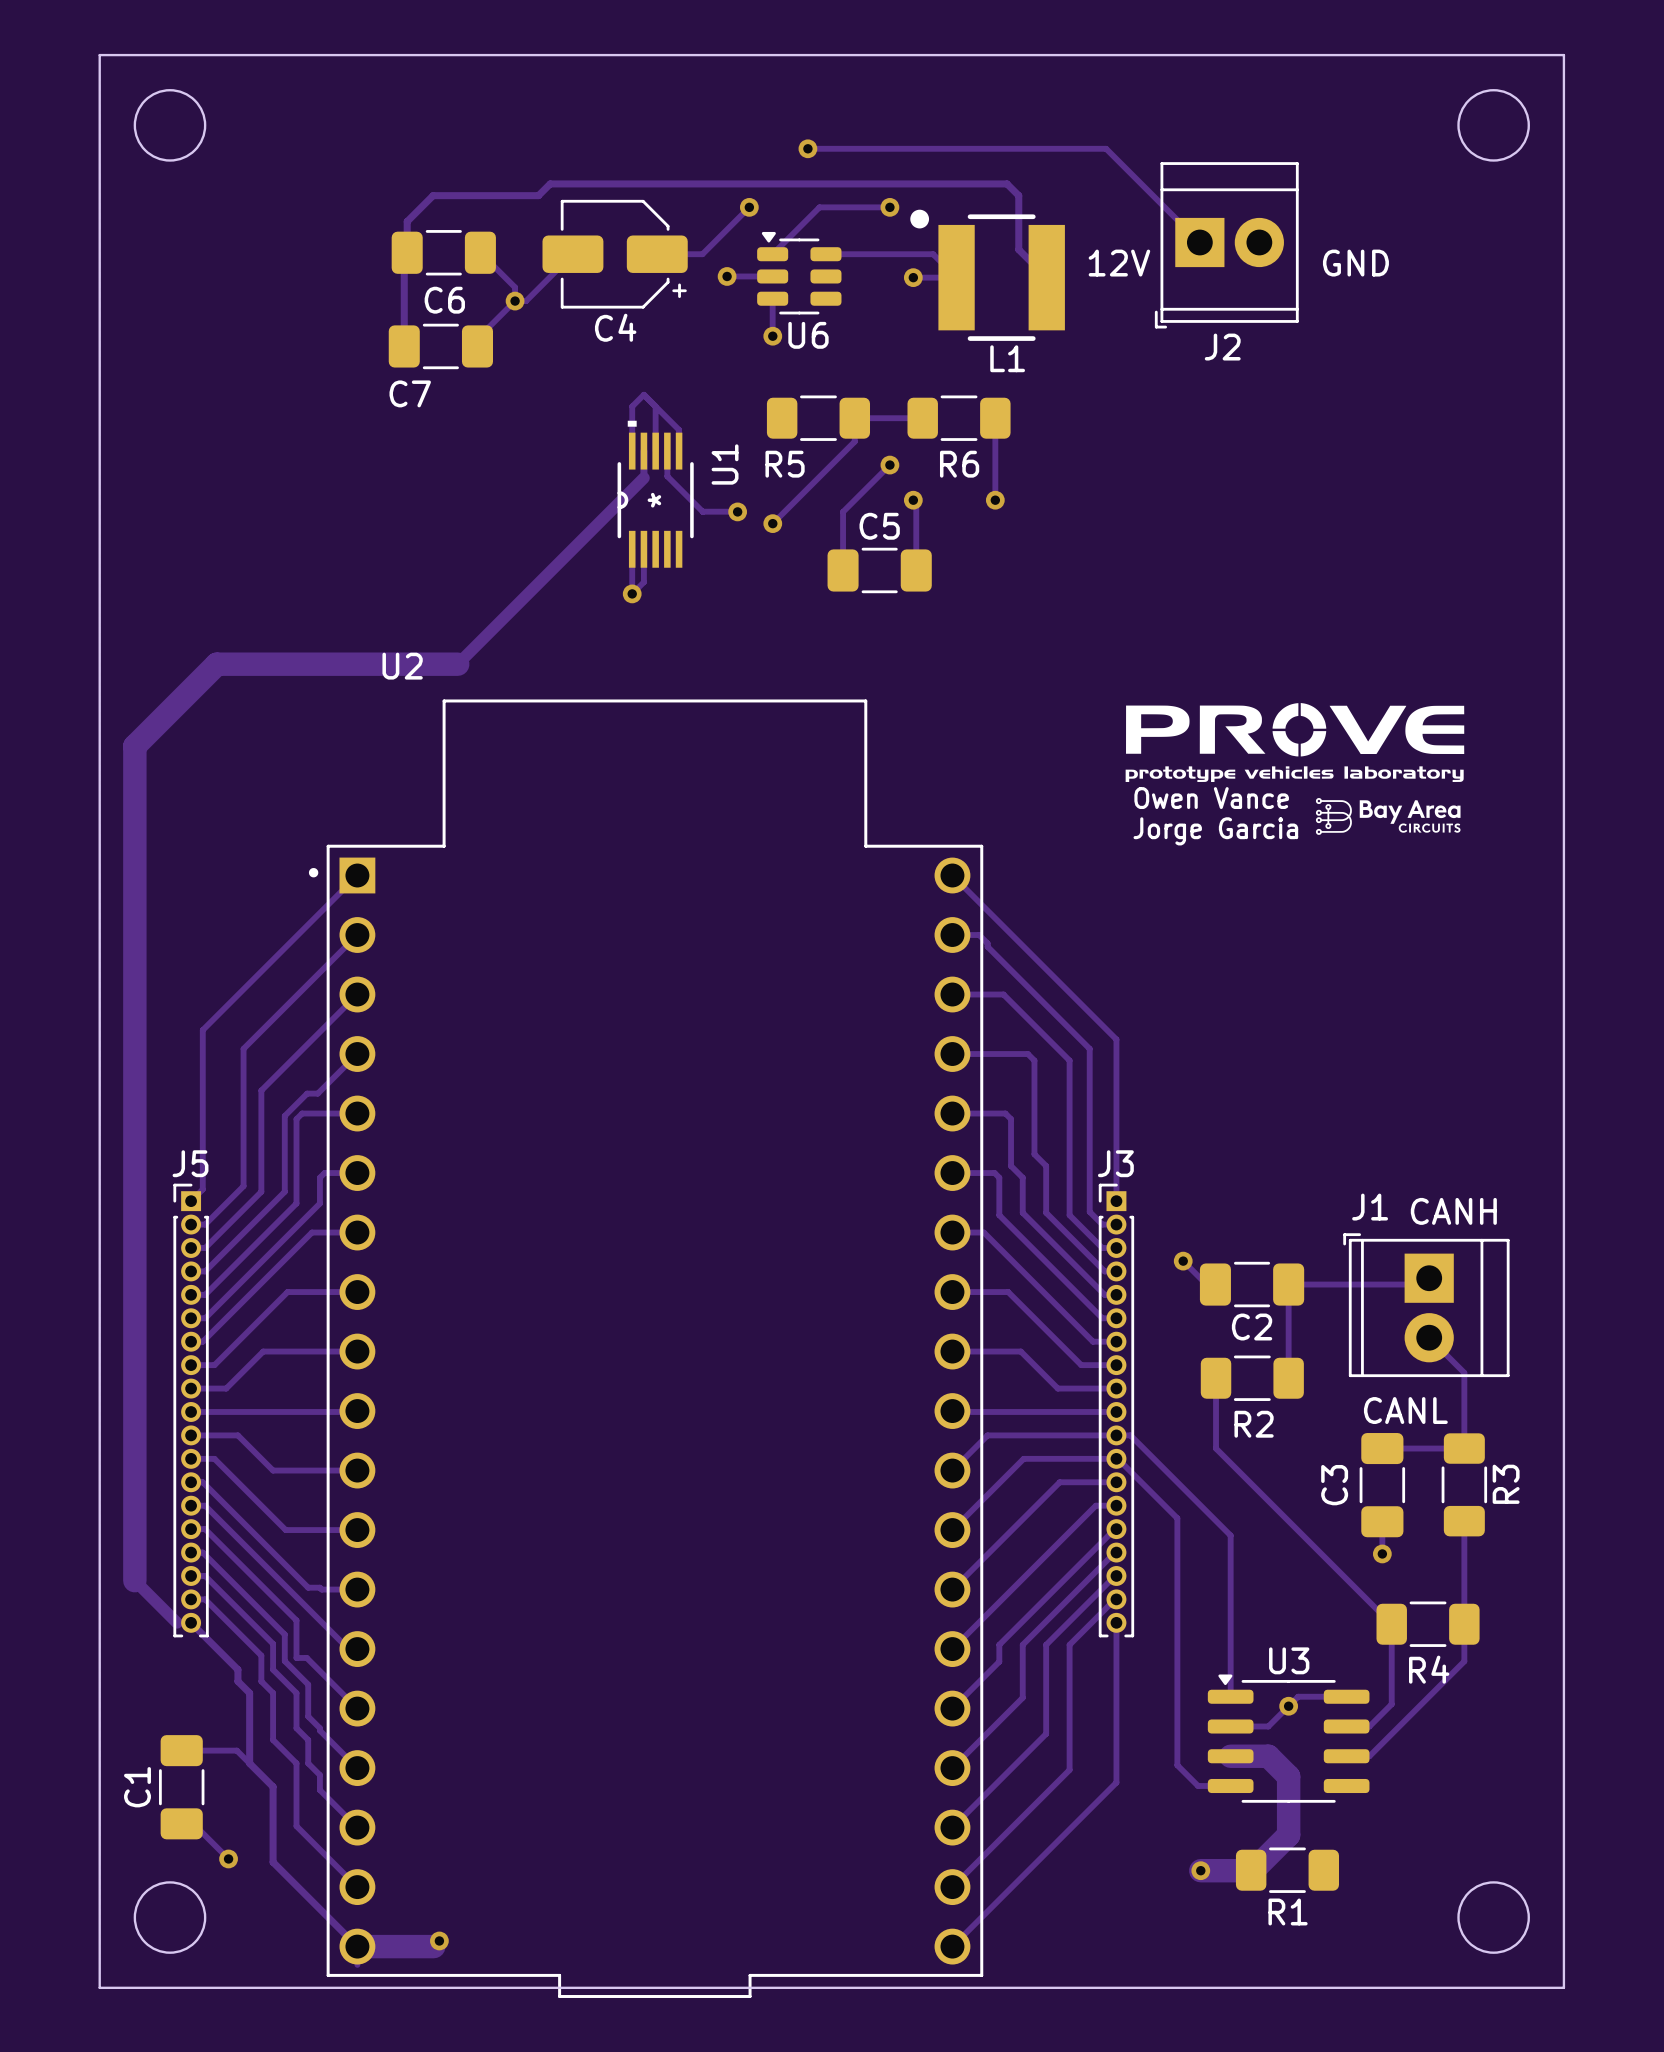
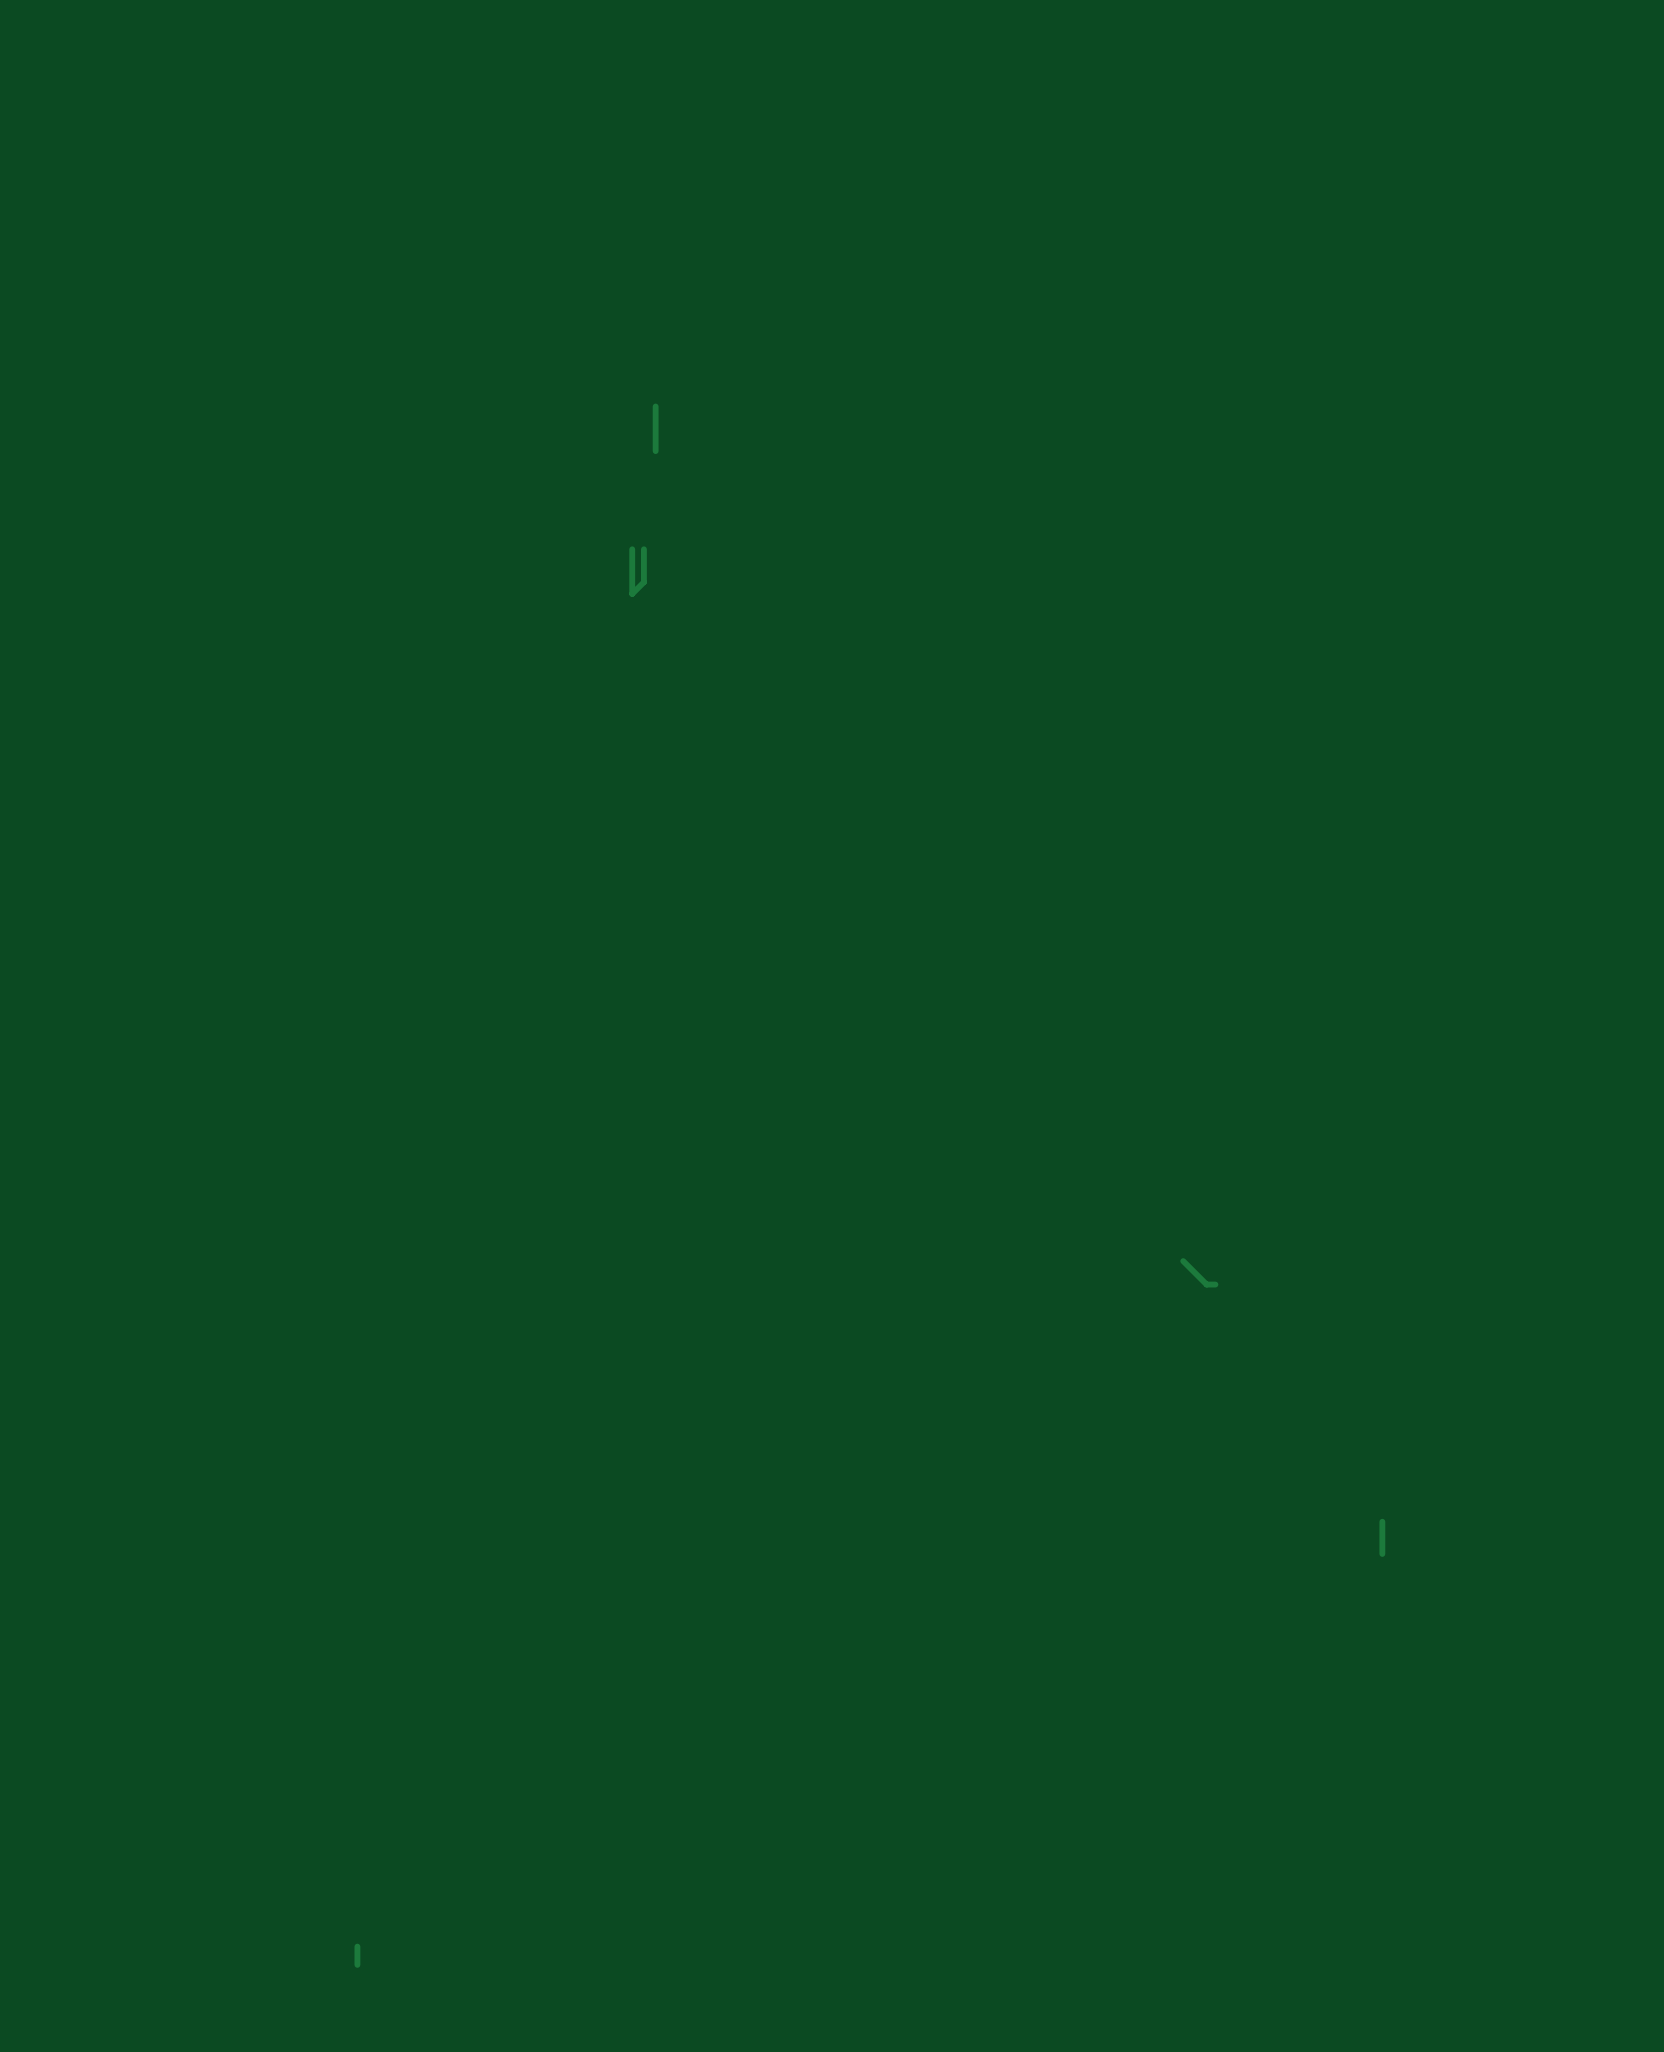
board edge: (99, 55) (1563, 55) (1563, 1987) (99, 1987) (99, 55) -> none
round board edge: [133, 89, 207, 162] -> none
round board edge: [1457, 89, 1530, 162] -> none
track: (807, 148) (1106, 148) (1199, 242) -> none
via: (807, 148) -> none
track: (749, 207) (702, 254) (657, 254) -> none
via: (749, 207) -> none
track: (889, 207) (819, 207) (772, 254) -> none
via: (889, 207) -> none
J2: (1226, 245) -> none
C6: (443, 252) -> none
track: (572, 254) (526, 301) (515, 301) -> none
C4: (615, 254) -> none
track: (825, 254) (933, 254) (956, 277) (913, 277) -> none
track: (477, 255) (480, 252) (515, 287) (515, 301) -> none
text: 12V (1119, 263) -> none
text: GND (1355, 263) -> none
U6: (799, 273) -> none
L1: (987, 275) -> none
track: (727, 276) (772, 276) -> none
via: (727, 276) -> none
via: (913, 277) -> none
track: (1046, 277) (1018, 249) (1018, 195) (1007, 183) (550, 183) (538, 195) (433, 195) (407, 221) (407, 252) (404, 255) (404, 346) -> none
track: (772, 298) (772, 336) -> none
track: (515, 301) (477, 338) (477, 346) -> none
via: (515, 301) -> none
via: (772, 336) -> none
C7: (440, 346) -> none
R5: (818, 418) -> none
track: (922, 418) (854, 418) (854, 441) (772, 523) -> none
R6: (959, 418) -> none
track: (995, 418) (995, 500) -> none
track: (632, 451) (632, 406) (643, 394) (679, 429) (679, 451) -> none
track: (643, 451) (643, 477) (457, 664) (216, 664) (134, 746) (134, 1580) (177, 1622) (191, 1622) (237, 1669) (237, 1681) (249, 1693) (249, 1763) -> none
track: (667, 451) (667, 476) (702, 511) -> none
track: (889, 465) (843, 511) (843, 570) -> none
via: (889, 465) -> none
U1: (655, 494) -> none
track: (913, 500) (916, 503) (916, 570) -> none
via: (913, 500) -> none
via: (995, 500) -> none
track: (703, 511) (737, 511) -> none
via: (737, 511) -> none
via: (772, 523) -> none
C5: (879, 570) -> none
via: (632, 593) -> none
drawing: [1125, 703, 1465, 835] -> none
text: Owen Vance (1211, 798) -> none
text: Jorge Garcia (1215, 831) -> none
track: (357, 875) (202, 1030) (202, 1189) (191, 1201) -> none
track: (952, 875) (1116, 1039) (1116, 1201) -> none
track: (357, 935) (243, 1048) (243, 1186) (205, 1224) (191, 1224) -> none
track: (952, 935) (979, 935) (987, 943) (987, 946) (1089, 1048) (1089, 1211) (1102, 1224) (1116, 1224) -> none
track: (357, 994) (261, 1090) (261, 1191) (205, 1247) (191, 1247) -> none
track: (952, 994) (1003, 994) (1069, 1060) (1069, 1215) (1102, 1247) (1116, 1247) -> none
track: (357, 1054) (317, 1093) (307, 1093) (284, 1115) (284, 1191) (205, 1271) (191, 1271) -> none
track: (952, 1054) (1027, 1054) (1034, 1060) (1034, 1154) (1046, 1166) (1046, 1212) (1104, 1271) (1116, 1271) -> none
track: (357, 1113) (302, 1113) (296, 1119) (296, 1203) (205, 1294) (191, 1294) -> none
track: (952, 1113) (1005, 1113) (1011, 1119) (1011, 1166) (1022, 1177) (1022, 1212) (1104, 1294) (1116, 1294) -> none
track: (357, 1173) (324, 1173) (319, 1177) (319, 1203) (205, 1318) (191, 1318) -> none
track: (952, 1173) (994, 1173) (999, 1177) (999, 1215) (1102, 1318) (1116, 1318) -> none
text: CANH (1453, 1211) -> none
track: (357, 1232) (311, 1232) (202, 1341) (191, 1341) -> none
track: (952, 1232) (983, 1232) (1093, 1341) (1116, 1341) -> none
via: (1183, 1261) -> none
track: (1429, 1278) (1422, 1284) (1288, 1284) (1288, 1378) -> none
C2: (1252, 1284) -> none
track: (357, 1292) (287, 1292) (214, 1365) (191, 1365) -> none
track: (952, 1292) (1008, 1292) (1081, 1365) (1116, 1365) -> none
J1: (1426, 1305) -> none
track: (1429, 1337) (1464, 1372) (1464, 1448) (1382, 1448) -> none
U2: (646, 1348) -> none
track: (357, 1351) (263, 1351) (226, 1388) (191, 1388) -> none
track: (952, 1351) (1020, 1351) (1057, 1388) (1116, 1388) -> none
track: (1216, 1378) (1216, 1448) (1391, 1624) (1391, 1704) (1369, 1726) (1346, 1726) -> none
R2: (1252, 1378) -> none
J5: (191, 1410) -> none
J3: (1116, 1410) -> none
text: CANL (1405, 1410) -> none
track: (357, 1411) (191, 1411) -> none
track: (952, 1411) (1116, 1411) -> none
track: (191, 1435) (237, 1435) (273, 1470) (357, 1470) -> none
track: (191, 1458) (214, 1458) (285, 1530) (357, 1530) -> none
track: (952, 1470) (987, 1435) (1130, 1435) (1230, 1535) (1230, 1696) -> none
track: (191, 1482) (202, 1482) (308, 1587) (357, 1589) -> none
track: (1116, 1482) (1059, 1482) (952, 1589) -> none
R3: (1464, 1484) -> none
C3: (1382, 1485) -> none
track: (191, 1505) (205, 1505) (348, 1649) (357, 1649) -> none
track: (1116, 1505) (1095, 1505) (952, 1649) -> none
track: (1464, 1521) (1464, 1661) (1369, 1756) (1346, 1756) -> none
track: (191, 1529) (205, 1529) (296, 1620) (296, 1657) (306, 1657) (357, 1708) -> none
track: (1116, 1529) (999, 1644) (999, 1661) (952, 1708) -> none
track: (952, 1530) (1023, 1458) (1117, 1458) (1177, 1518) (1177, 1765) (1198, 1786) (1230, 1786) -> none
track: (191, 1552) (202, 1552) (284, 1634) (284, 1661) (308, 1684) (308, 1716) (357, 1768) -> none
track: (1116, 1552) (1022, 1644) (1022, 1697) (952, 1768) -> none
via: (1382, 1553) -> none
track: (191, 1575) (205, 1575) (273, 1643) (273, 1669) (296, 1693) (296, 1728) (308, 1739) (308, 1763) (319, 1775) (319, 1790) (357, 1827) -> none
track: (1116, 1575) (1046, 1644) (1046, 1733) (952, 1827) -> none
track: (191, 1599) (205, 1599) (261, 1655) (261, 1681) (273, 1693) (273, 1739) (296, 1763) (296, 1826) (357, 1887) -> none
track: (1116, 1599) (1069, 1644) (1069, 1769) (952, 1887) -> none
track: (1116, 1622) (1116, 1782) (952, 1946) -> none
R4: (1428, 1624) -> none
track: (1346, 1696) (1298, 1696) (1268, 1726) (1230, 1726) -> none
via: (1288, 1706) -> none
U3: (1288, 1738) -> none
track: (181, 1750) (236, 1750) (249, 1763) -> none
track: (1230, 1756) (1268, 1756) (1288, 1776) (1288, 1835) (1253, 1870) (1200, 1870) -> none
track: (249, 1763) (273, 1786) (273, 1862) (357, 1946) (433, 1946) (439, 1940) -> none
C1: (181, 1787) -> none
track: (181, 1823) (193, 1823) (228, 1858) -> none
via: (228, 1858) -> none
via: (1200, 1870) -> none
R1: (1287, 1870) -> none
round board edge: [133, 1881, 207, 1954] -> none
round board edge: [1457, 1881, 1530, 1954] -> none
via: (439, 1940) -> none

